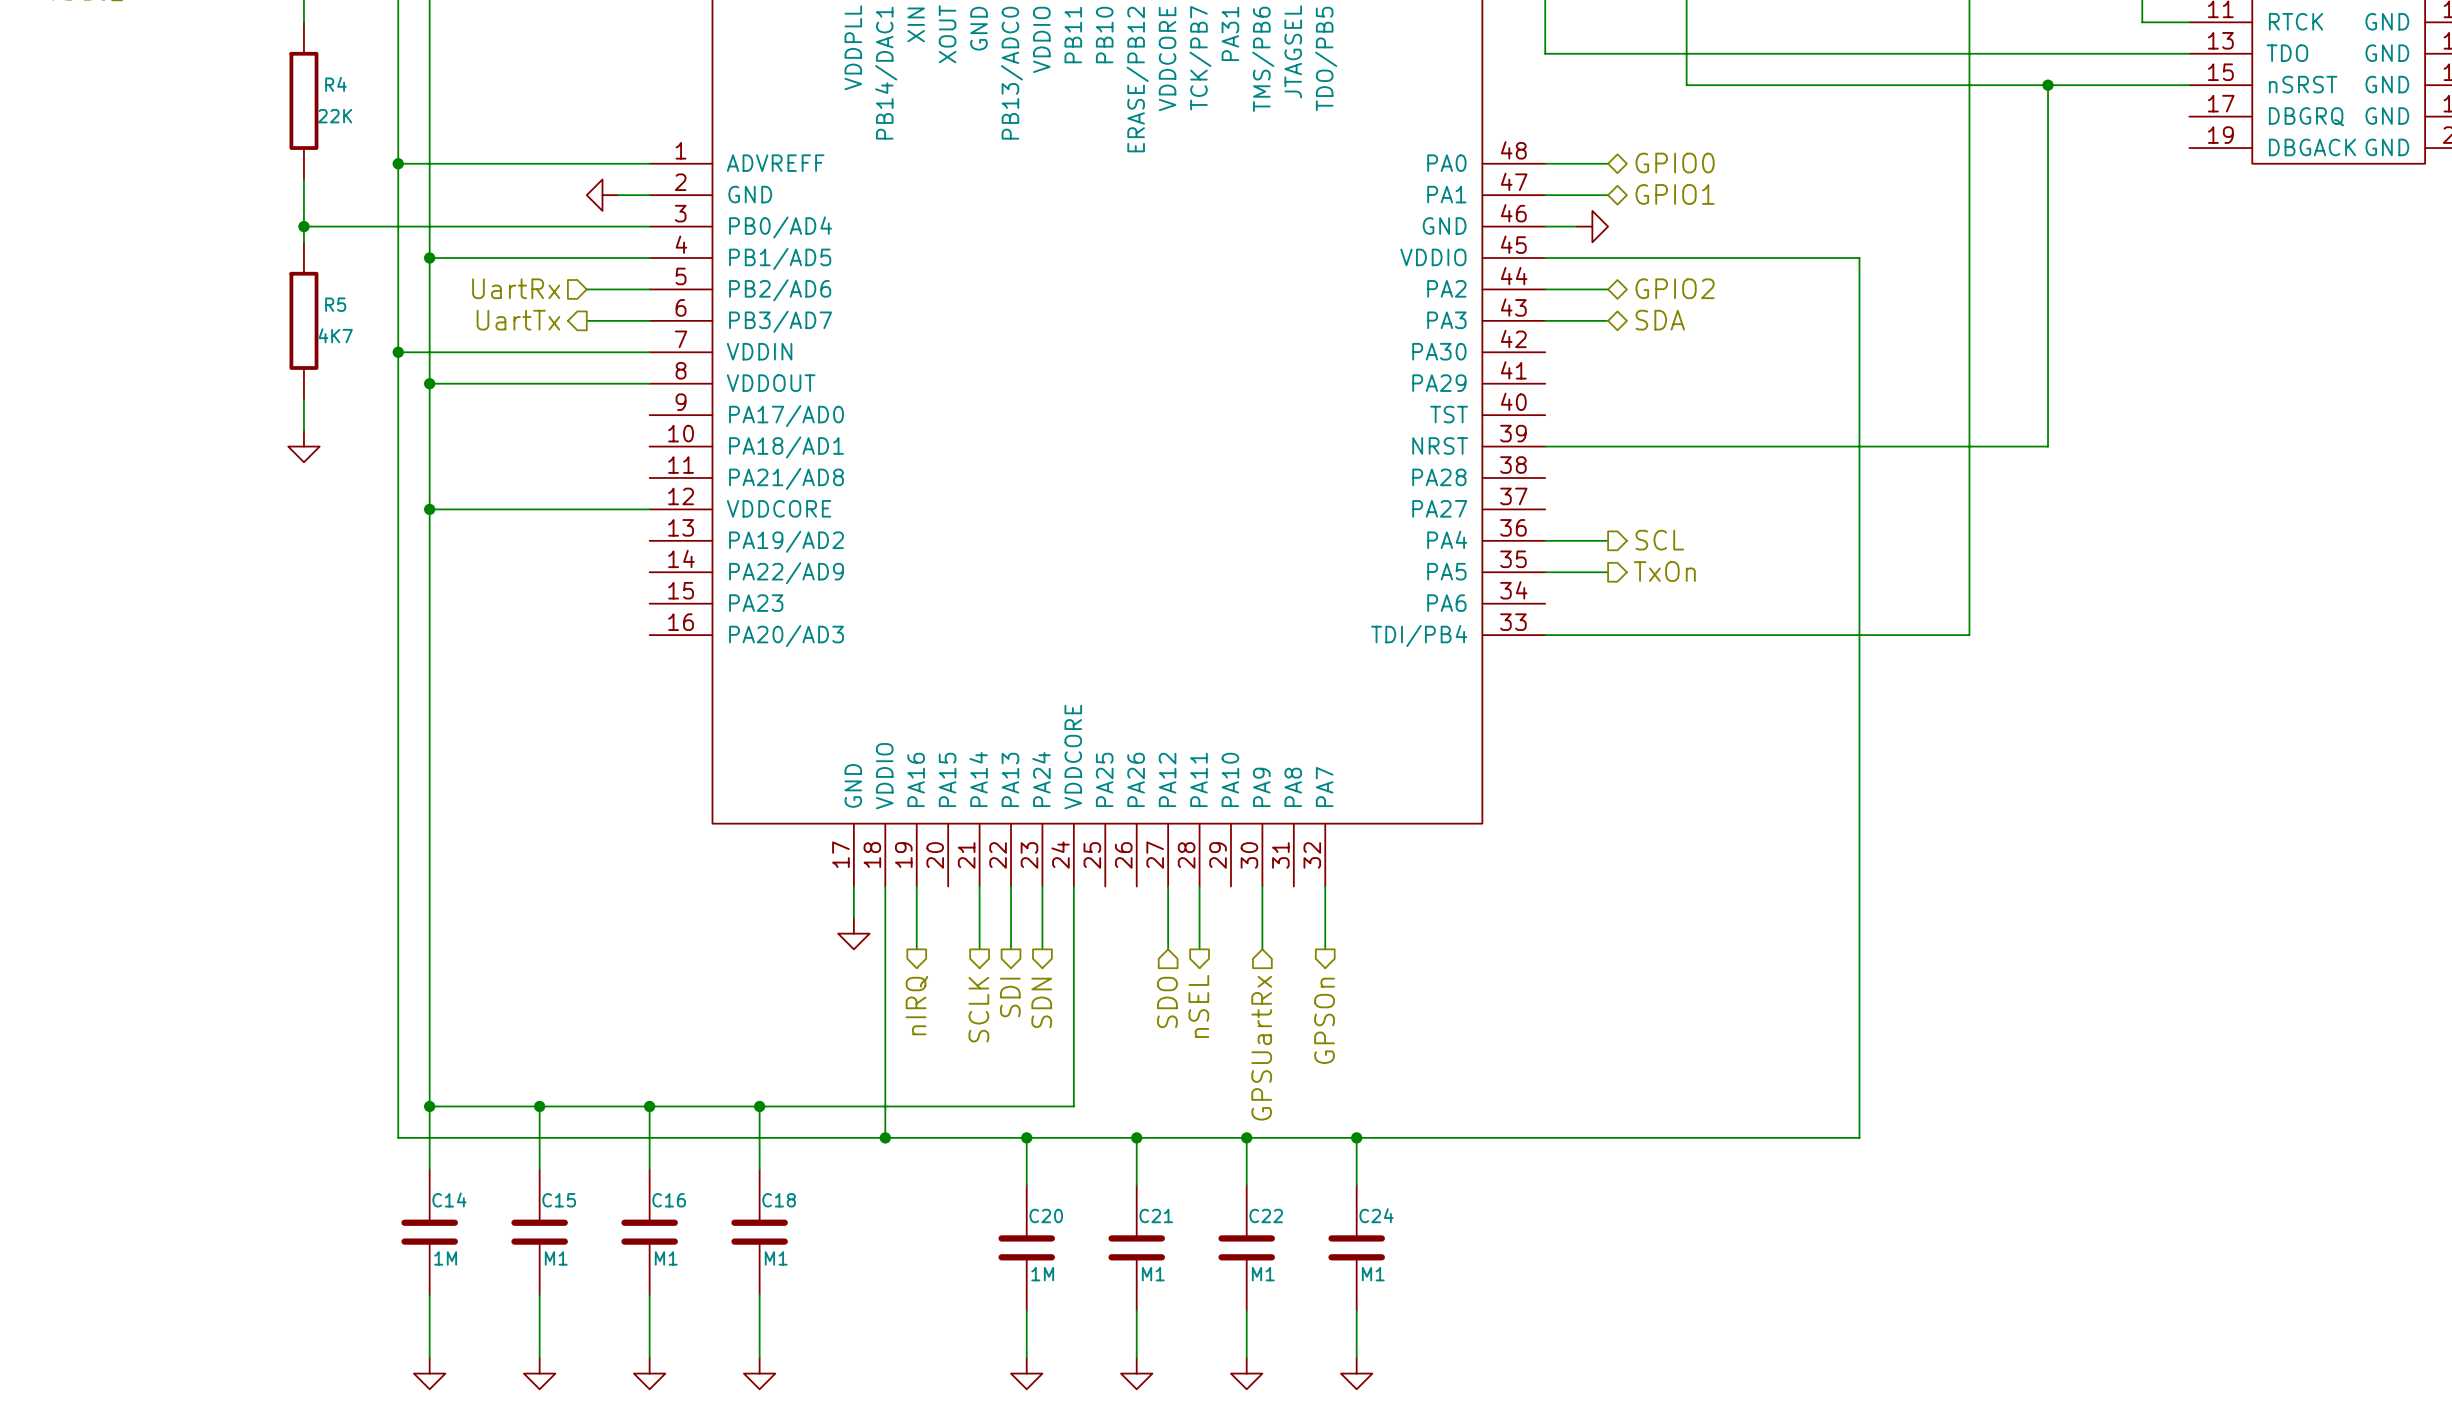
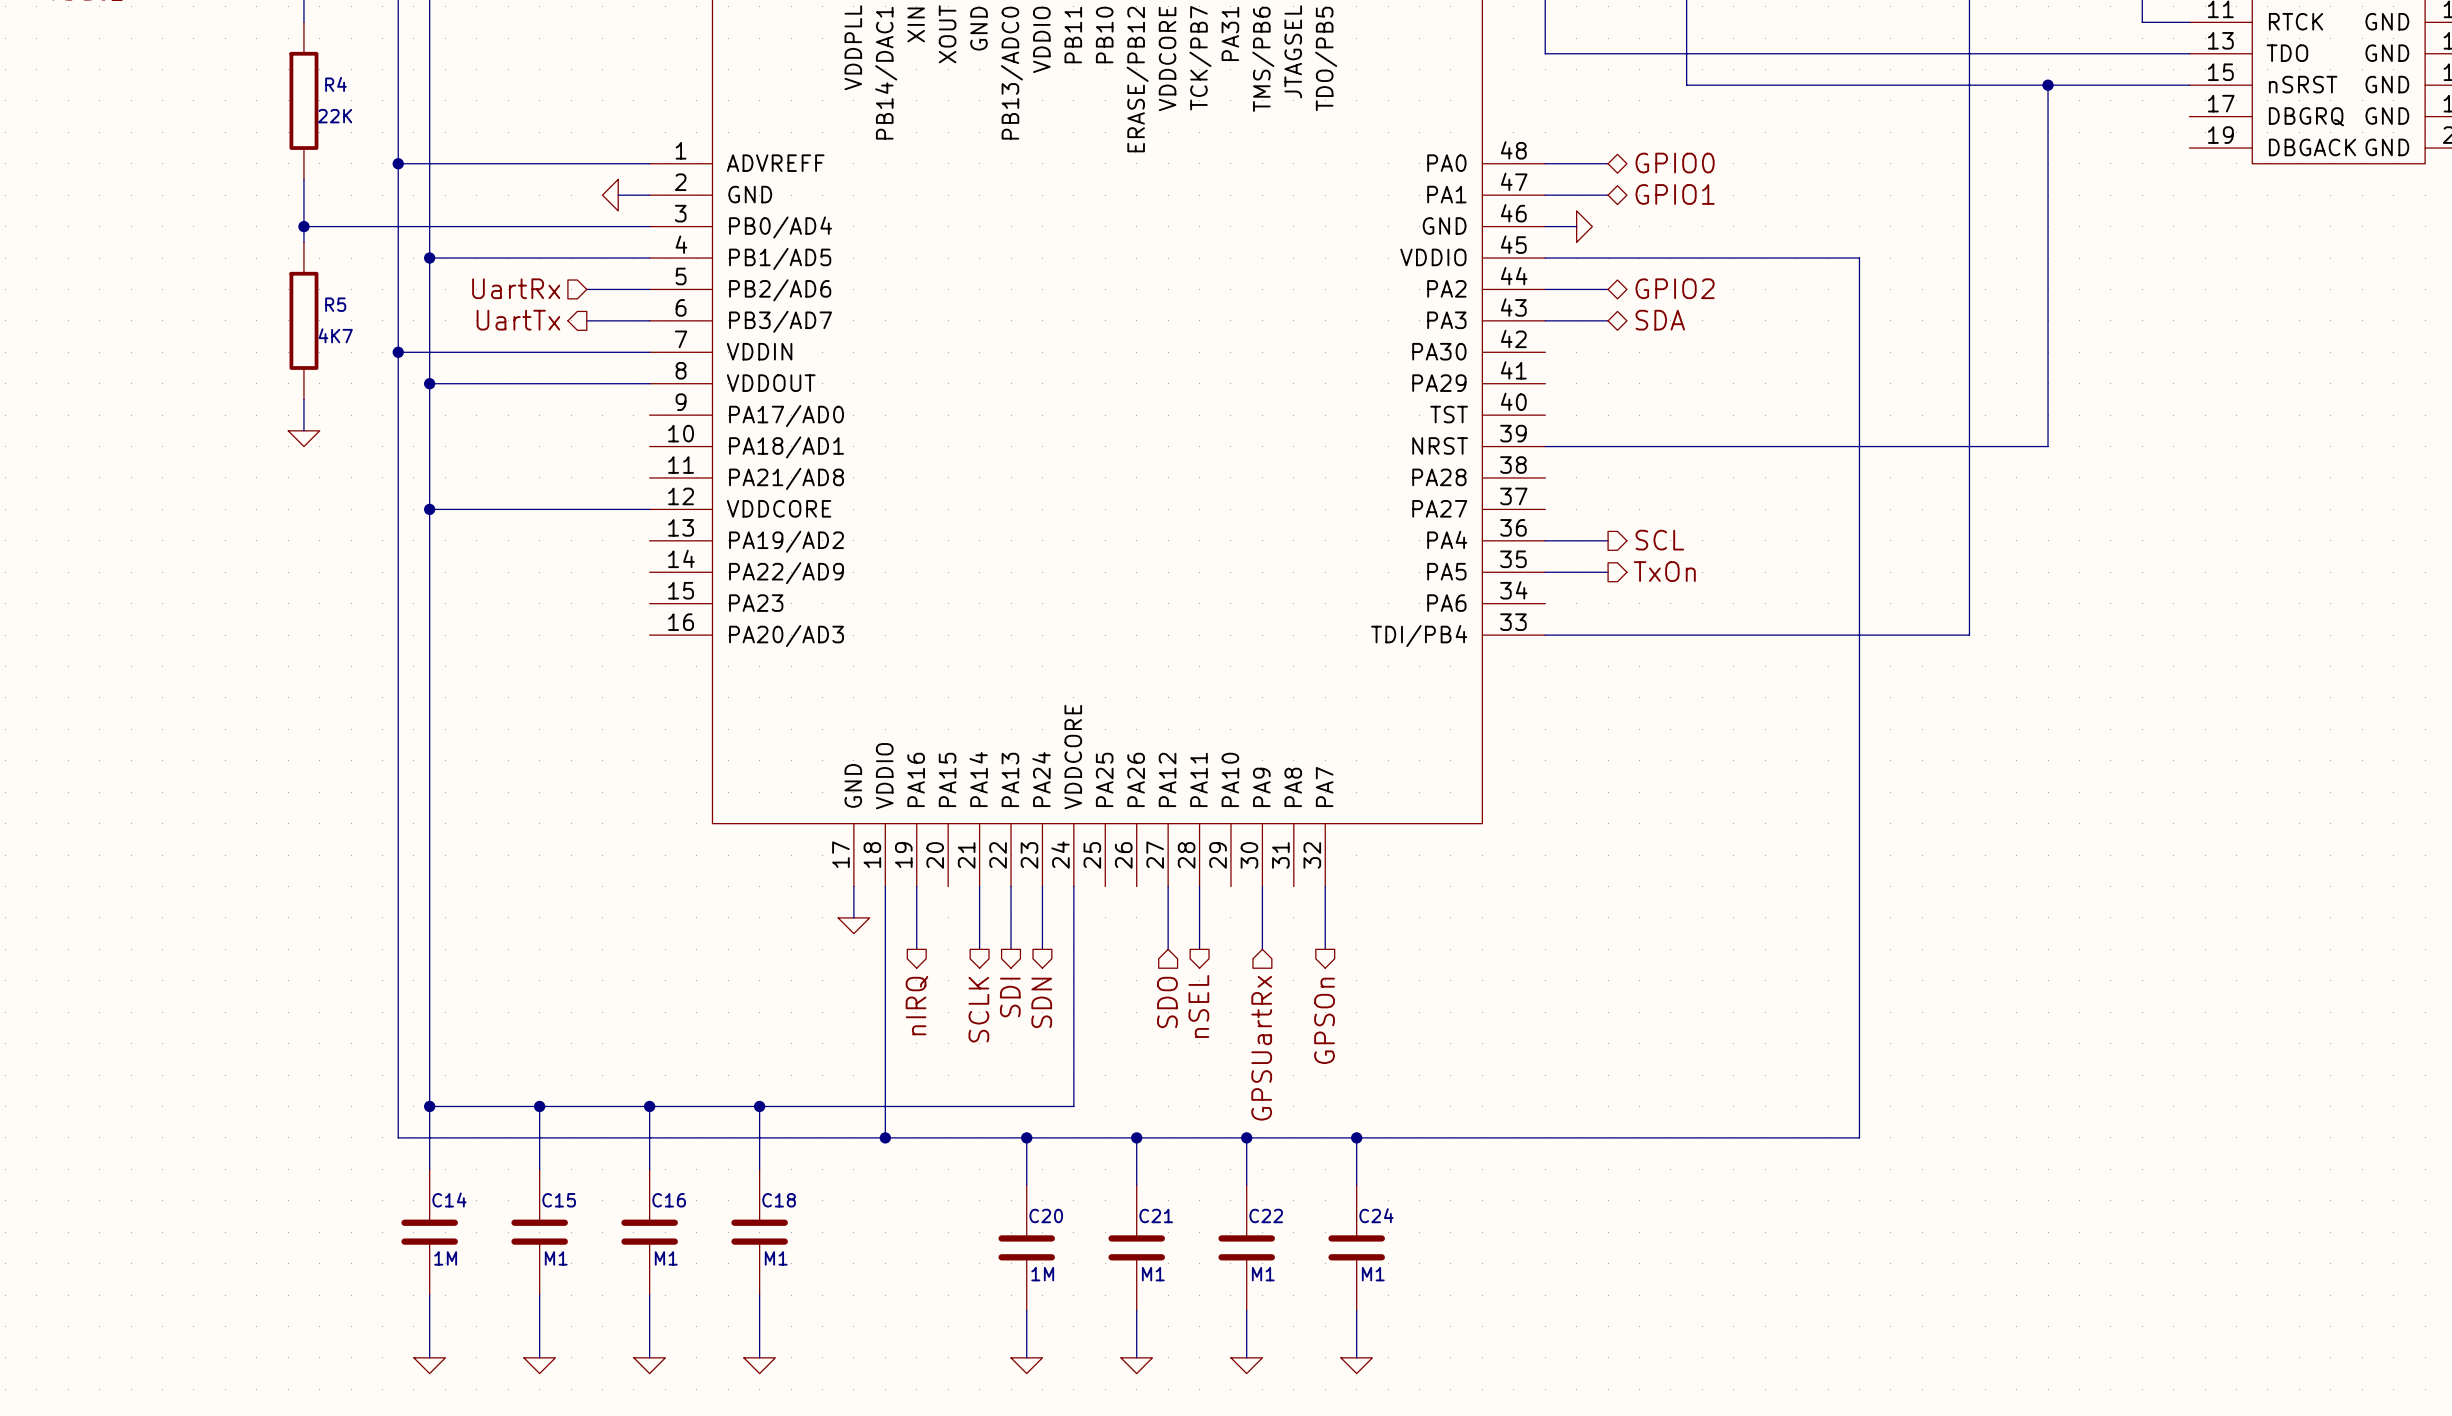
power symbol shape: [586, 179, 619, 211] -> [602, 179, 619, 211]
power symbol shape: [1576, 210, 1609, 243] -> [1576, 210, 1593, 243]
power symbol shape: [288, 430, 320, 463] -> [288, 430, 320, 447]
power symbol shape: [838, 917, 870, 950] -> [838, 917, 870, 934]
power symbol shape: [413, 1357, 446, 1390] -> [413, 1357, 446, 1374]
power symbol shape: [523, 1357, 556, 1390] -> [523, 1357, 556, 1374]
power symbol shape: [633, 1357, 666, 1390] -> [633, 1357, 666, 1374]
power symbol shape: [743, 1357, 776, 1390] -> [743, 1357, 776, 1374]
power symbol shape: [1011, 1357, 1043, 1390] -> [1011, 1357, 1043, 1374]
power symbol shape: [1121, 1357, 1153, 1390] -> [1121, 1357, 1153, 1374]
power symbol shape: [1230, 1357, 1263, 1390] -> [1230, 1357, 1263, 1374]
power symbol shape: [1340, 1357, 1373, 1390] -> [1340, 1357, 1373, 1374]

